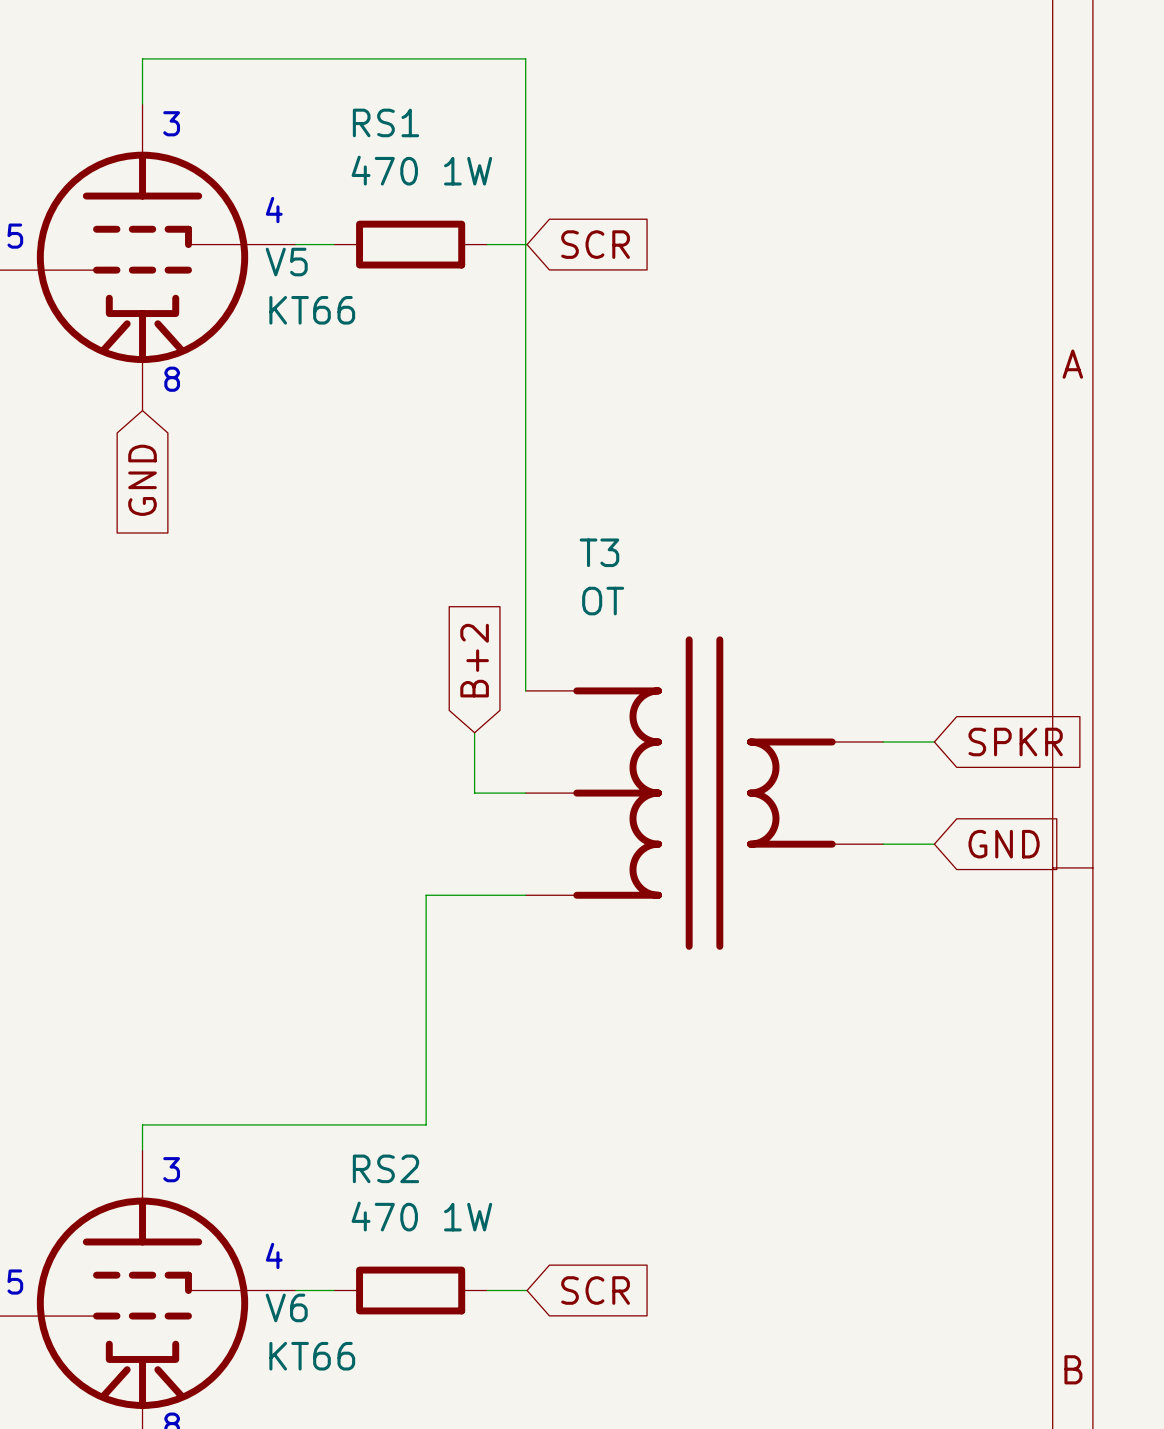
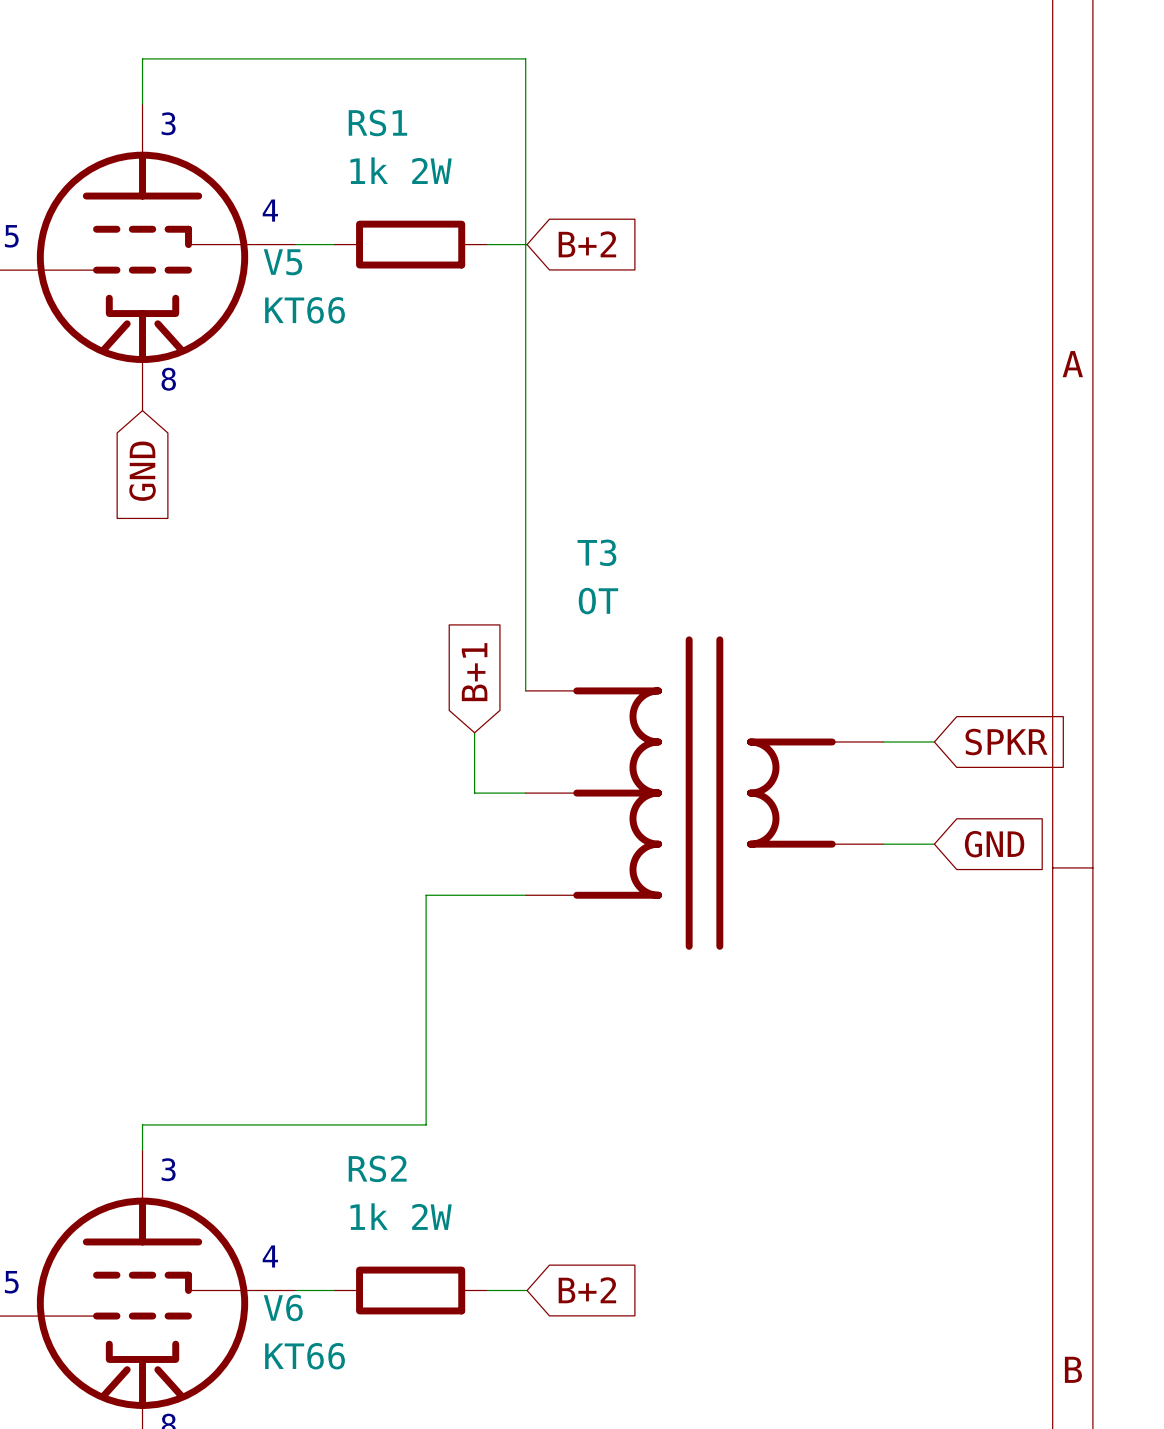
RS1 value: 470 1W (421, 170) -> 1k 2W (401, 170)
global label: SCR (595, 244) -> B+2 (587, 244)
global label: B+2 (474, 660) -> B+1 (474, 672)
RS2 value: 470 1W (421, 1216) -> 1k 2W (401, 1216)
global label: SCR (595, 1290) -> B+2 (587, 1290)

